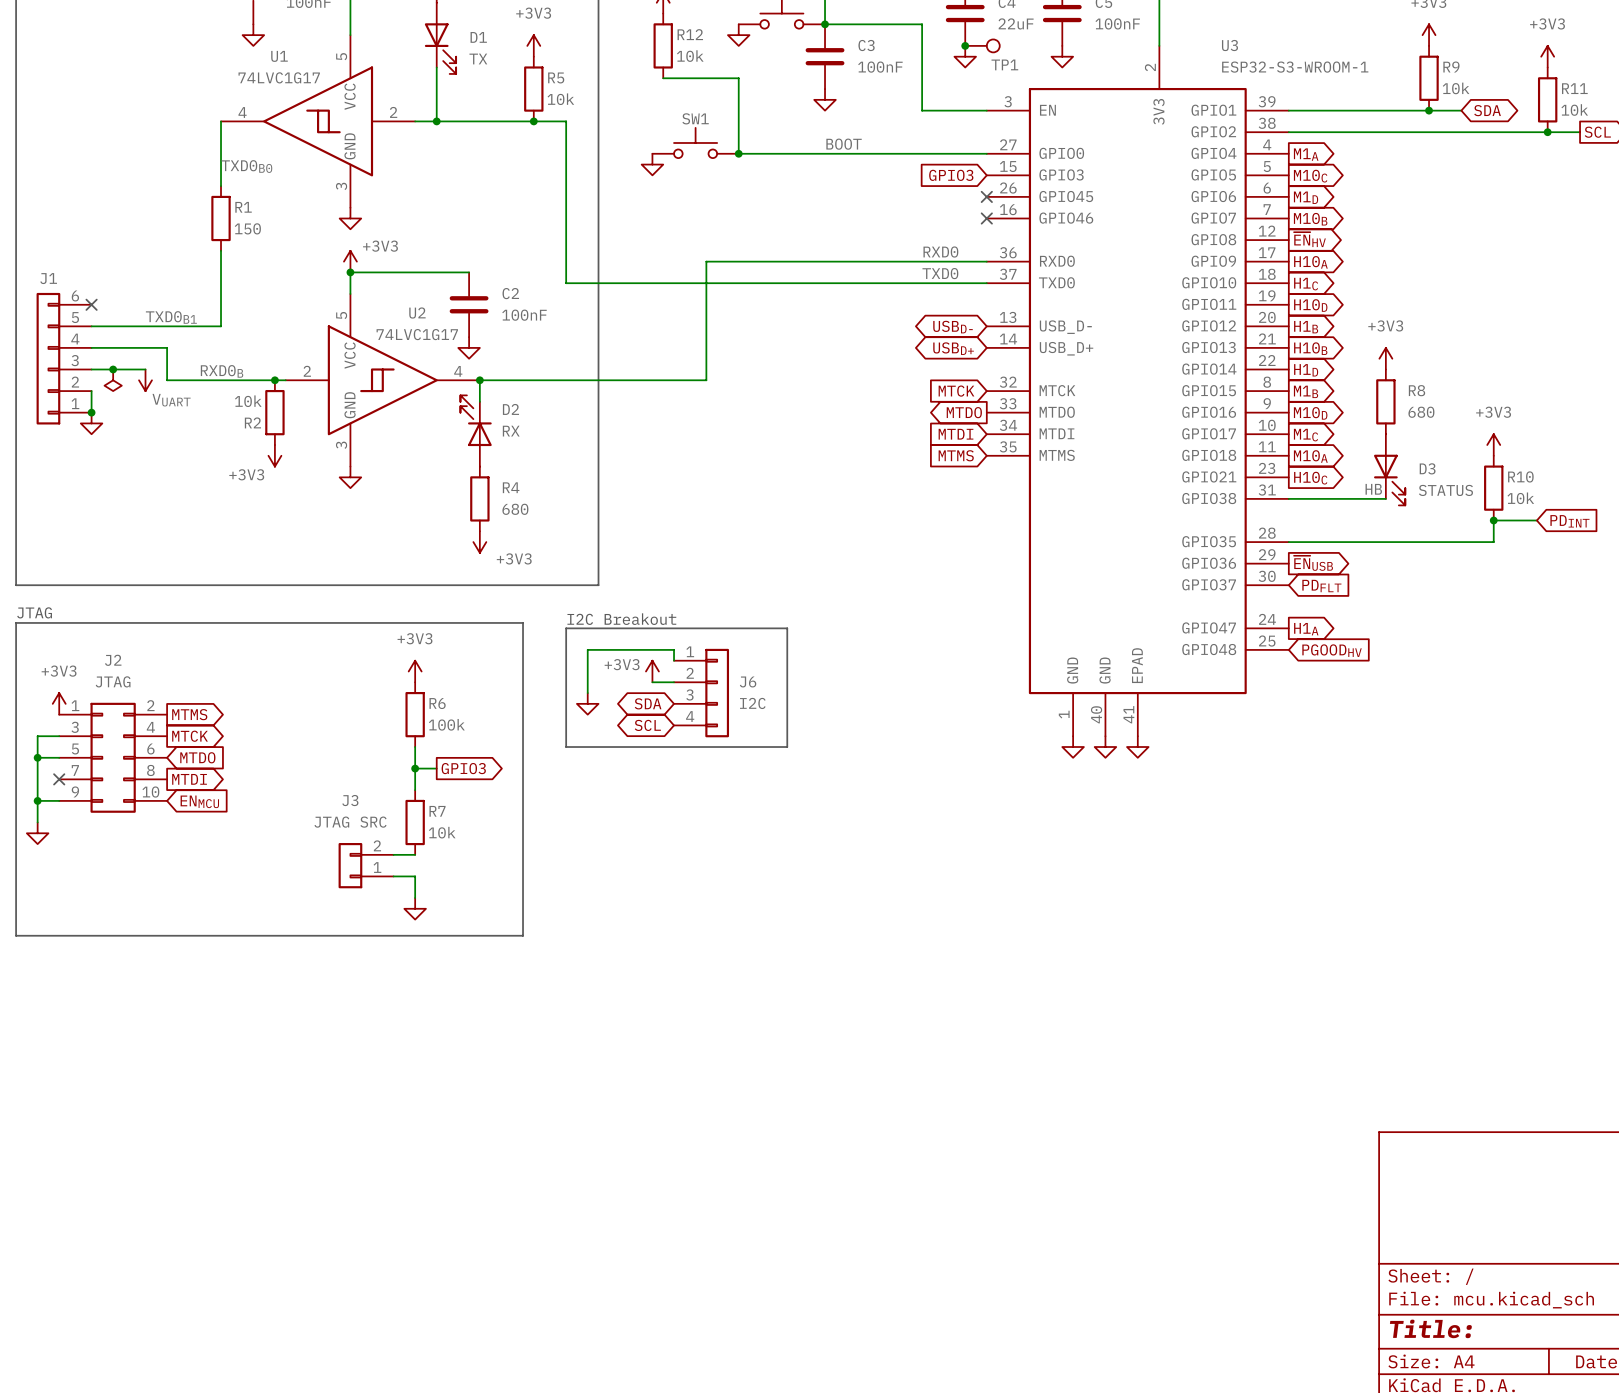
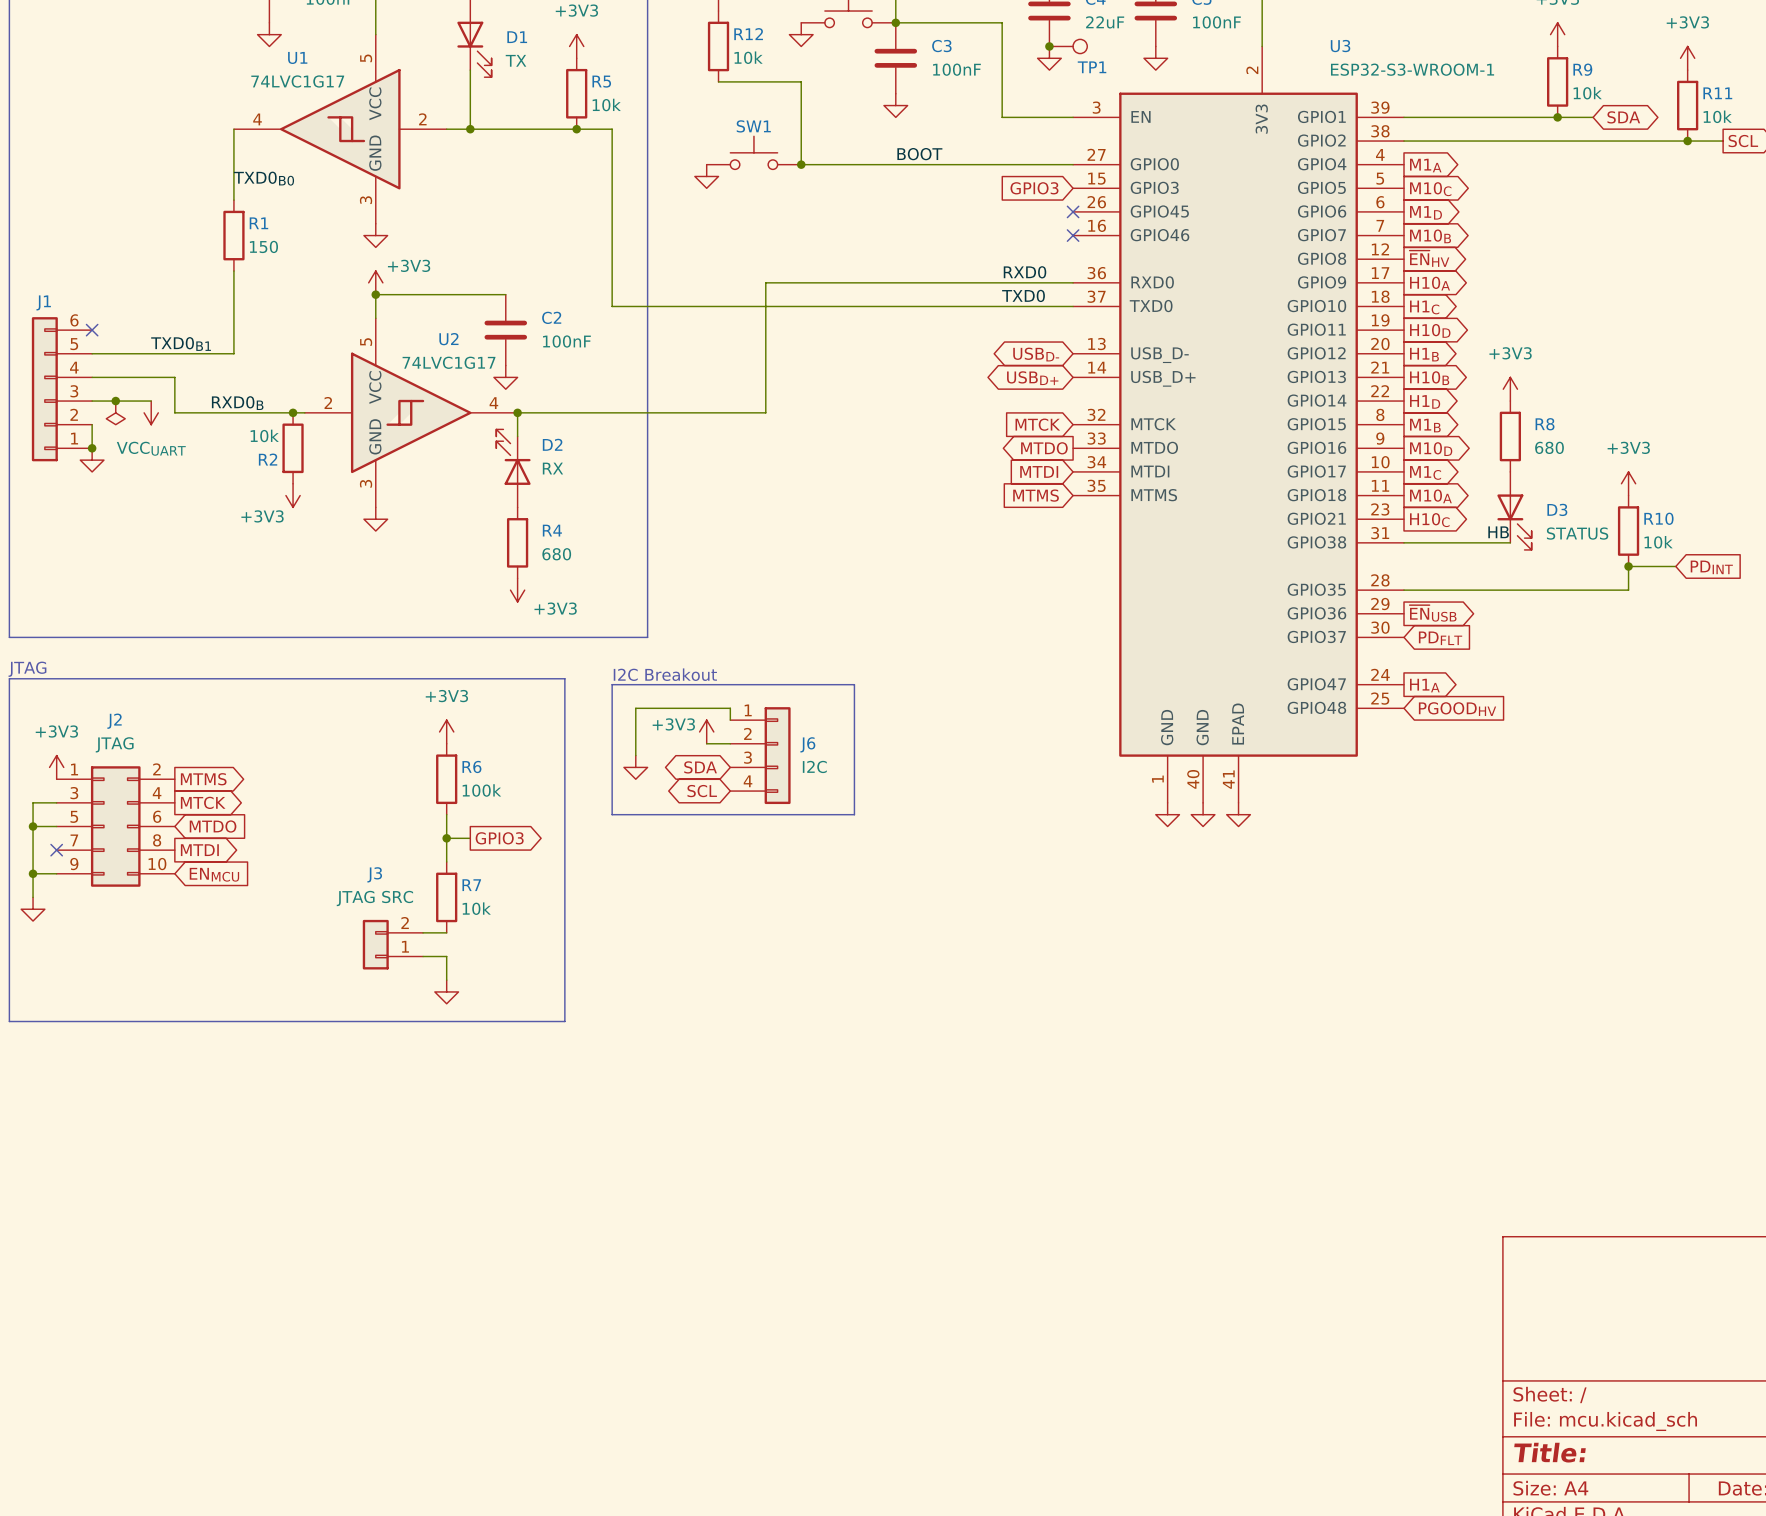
power symbol: VUART (145, 380) -> VCCUART (151, 412)

